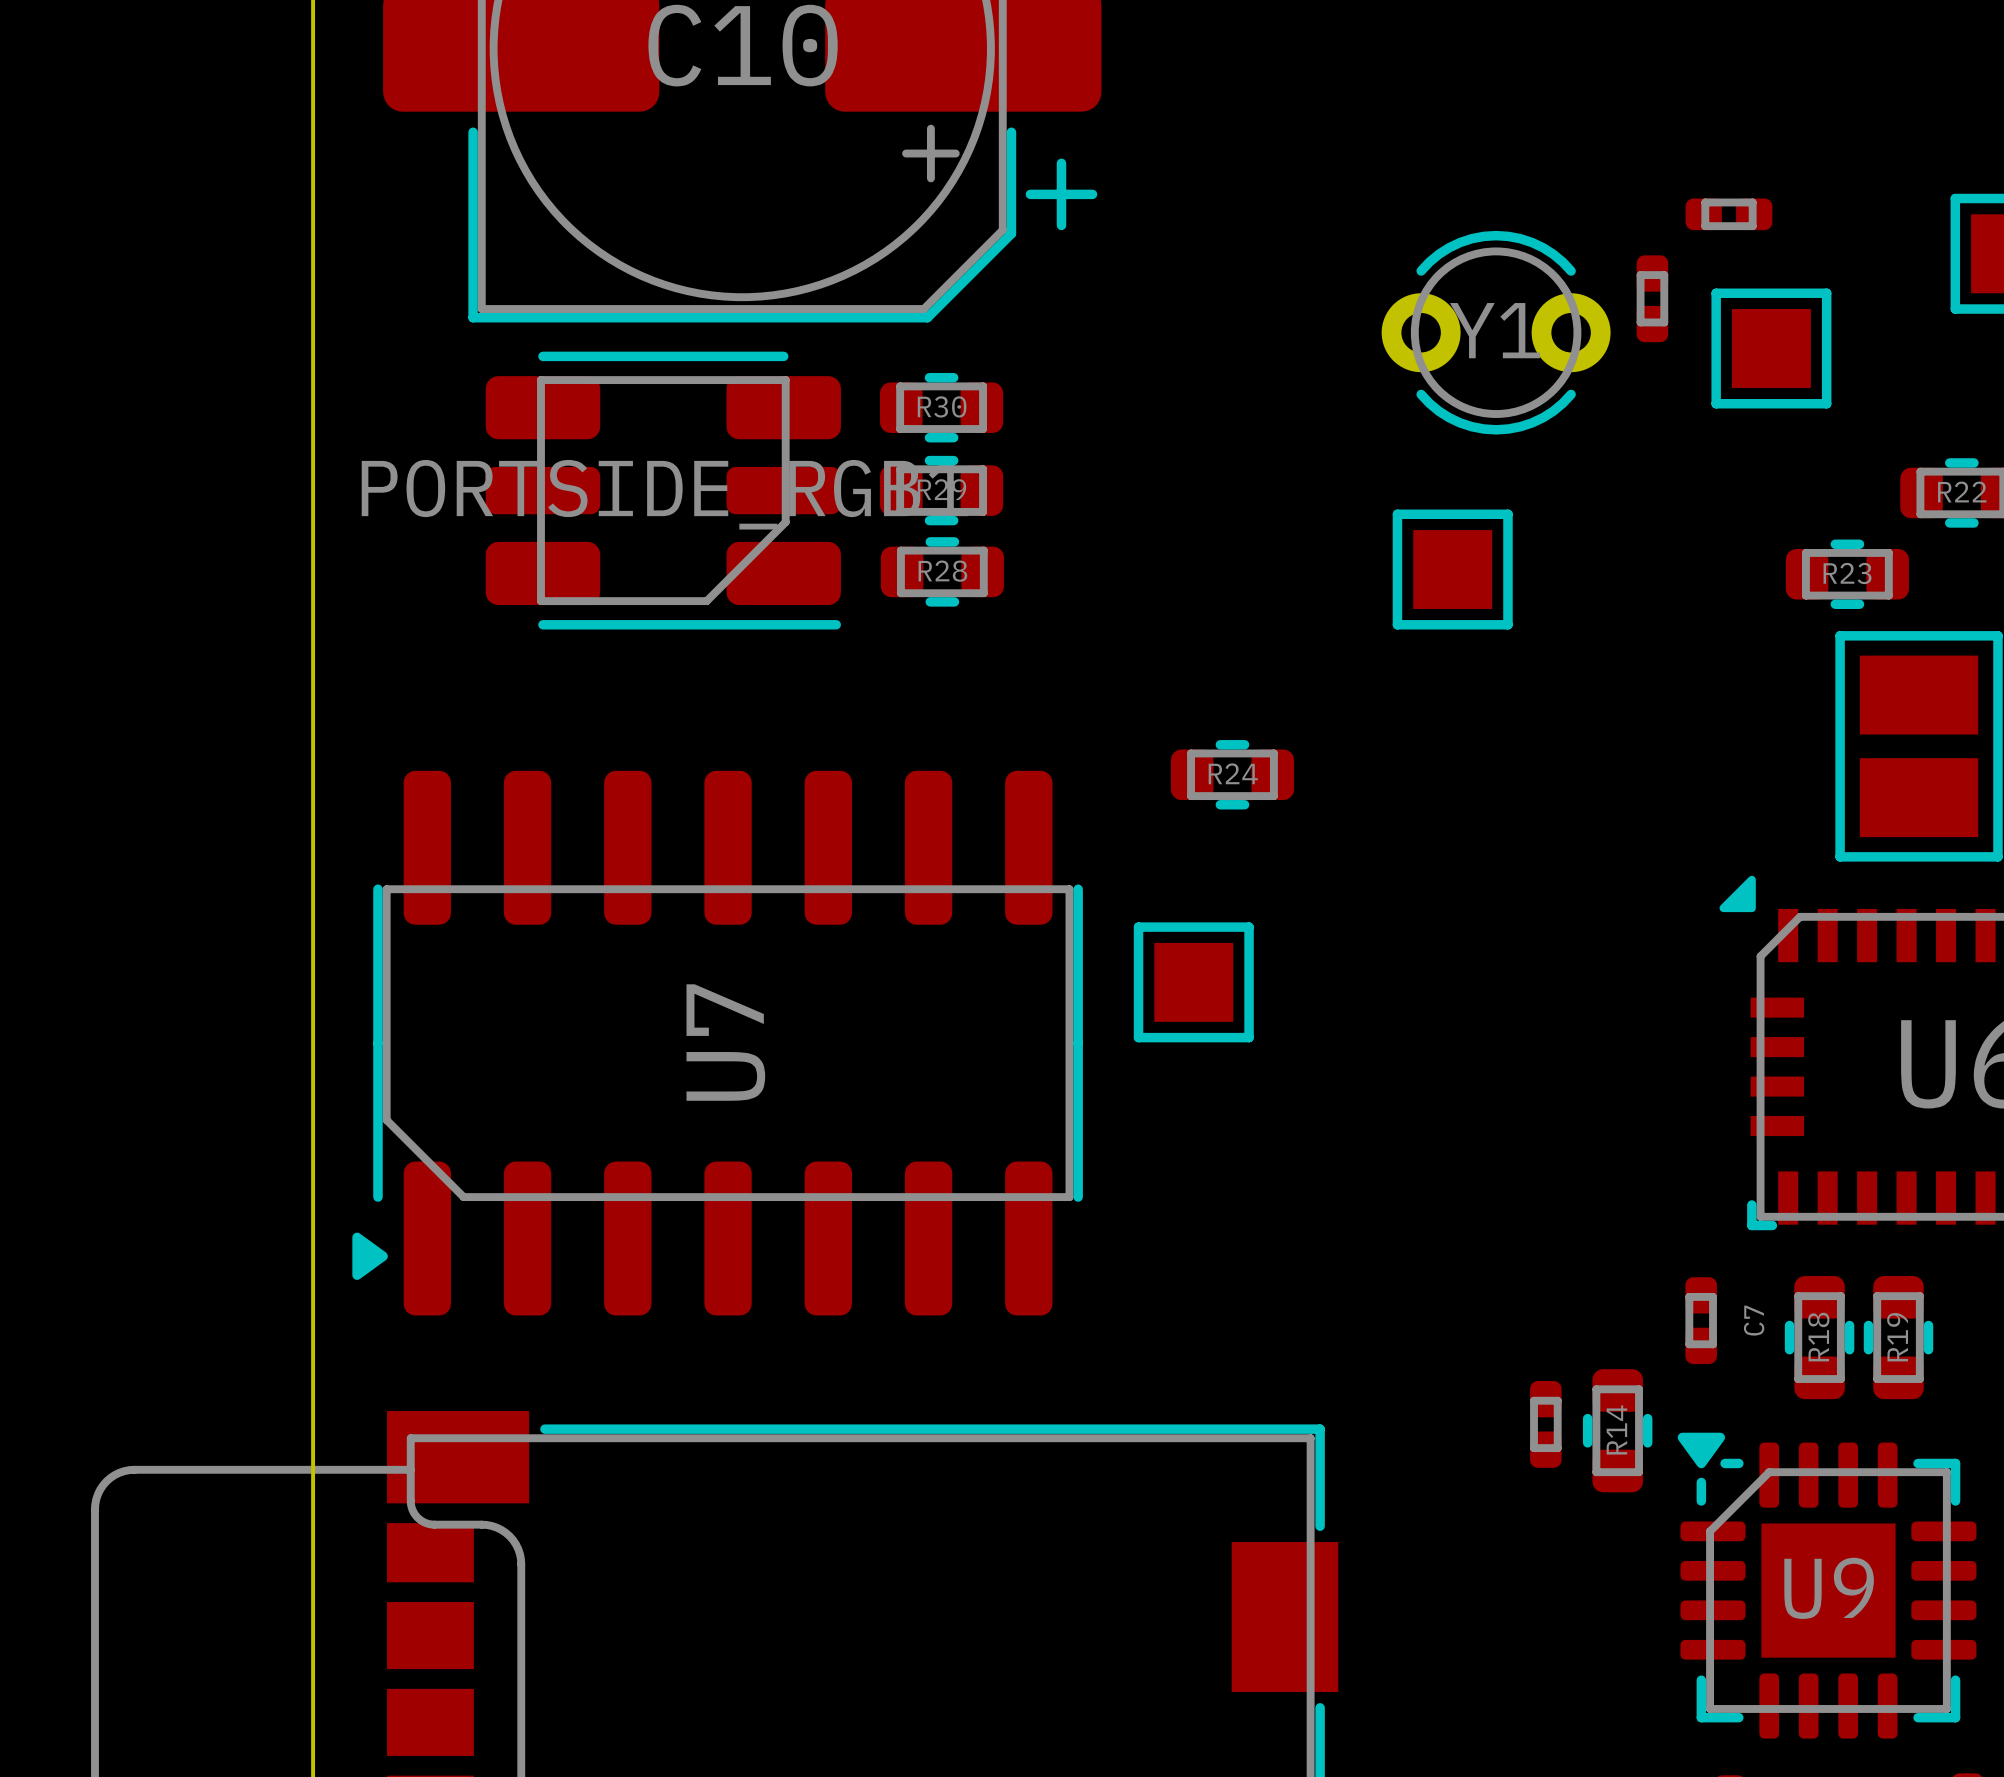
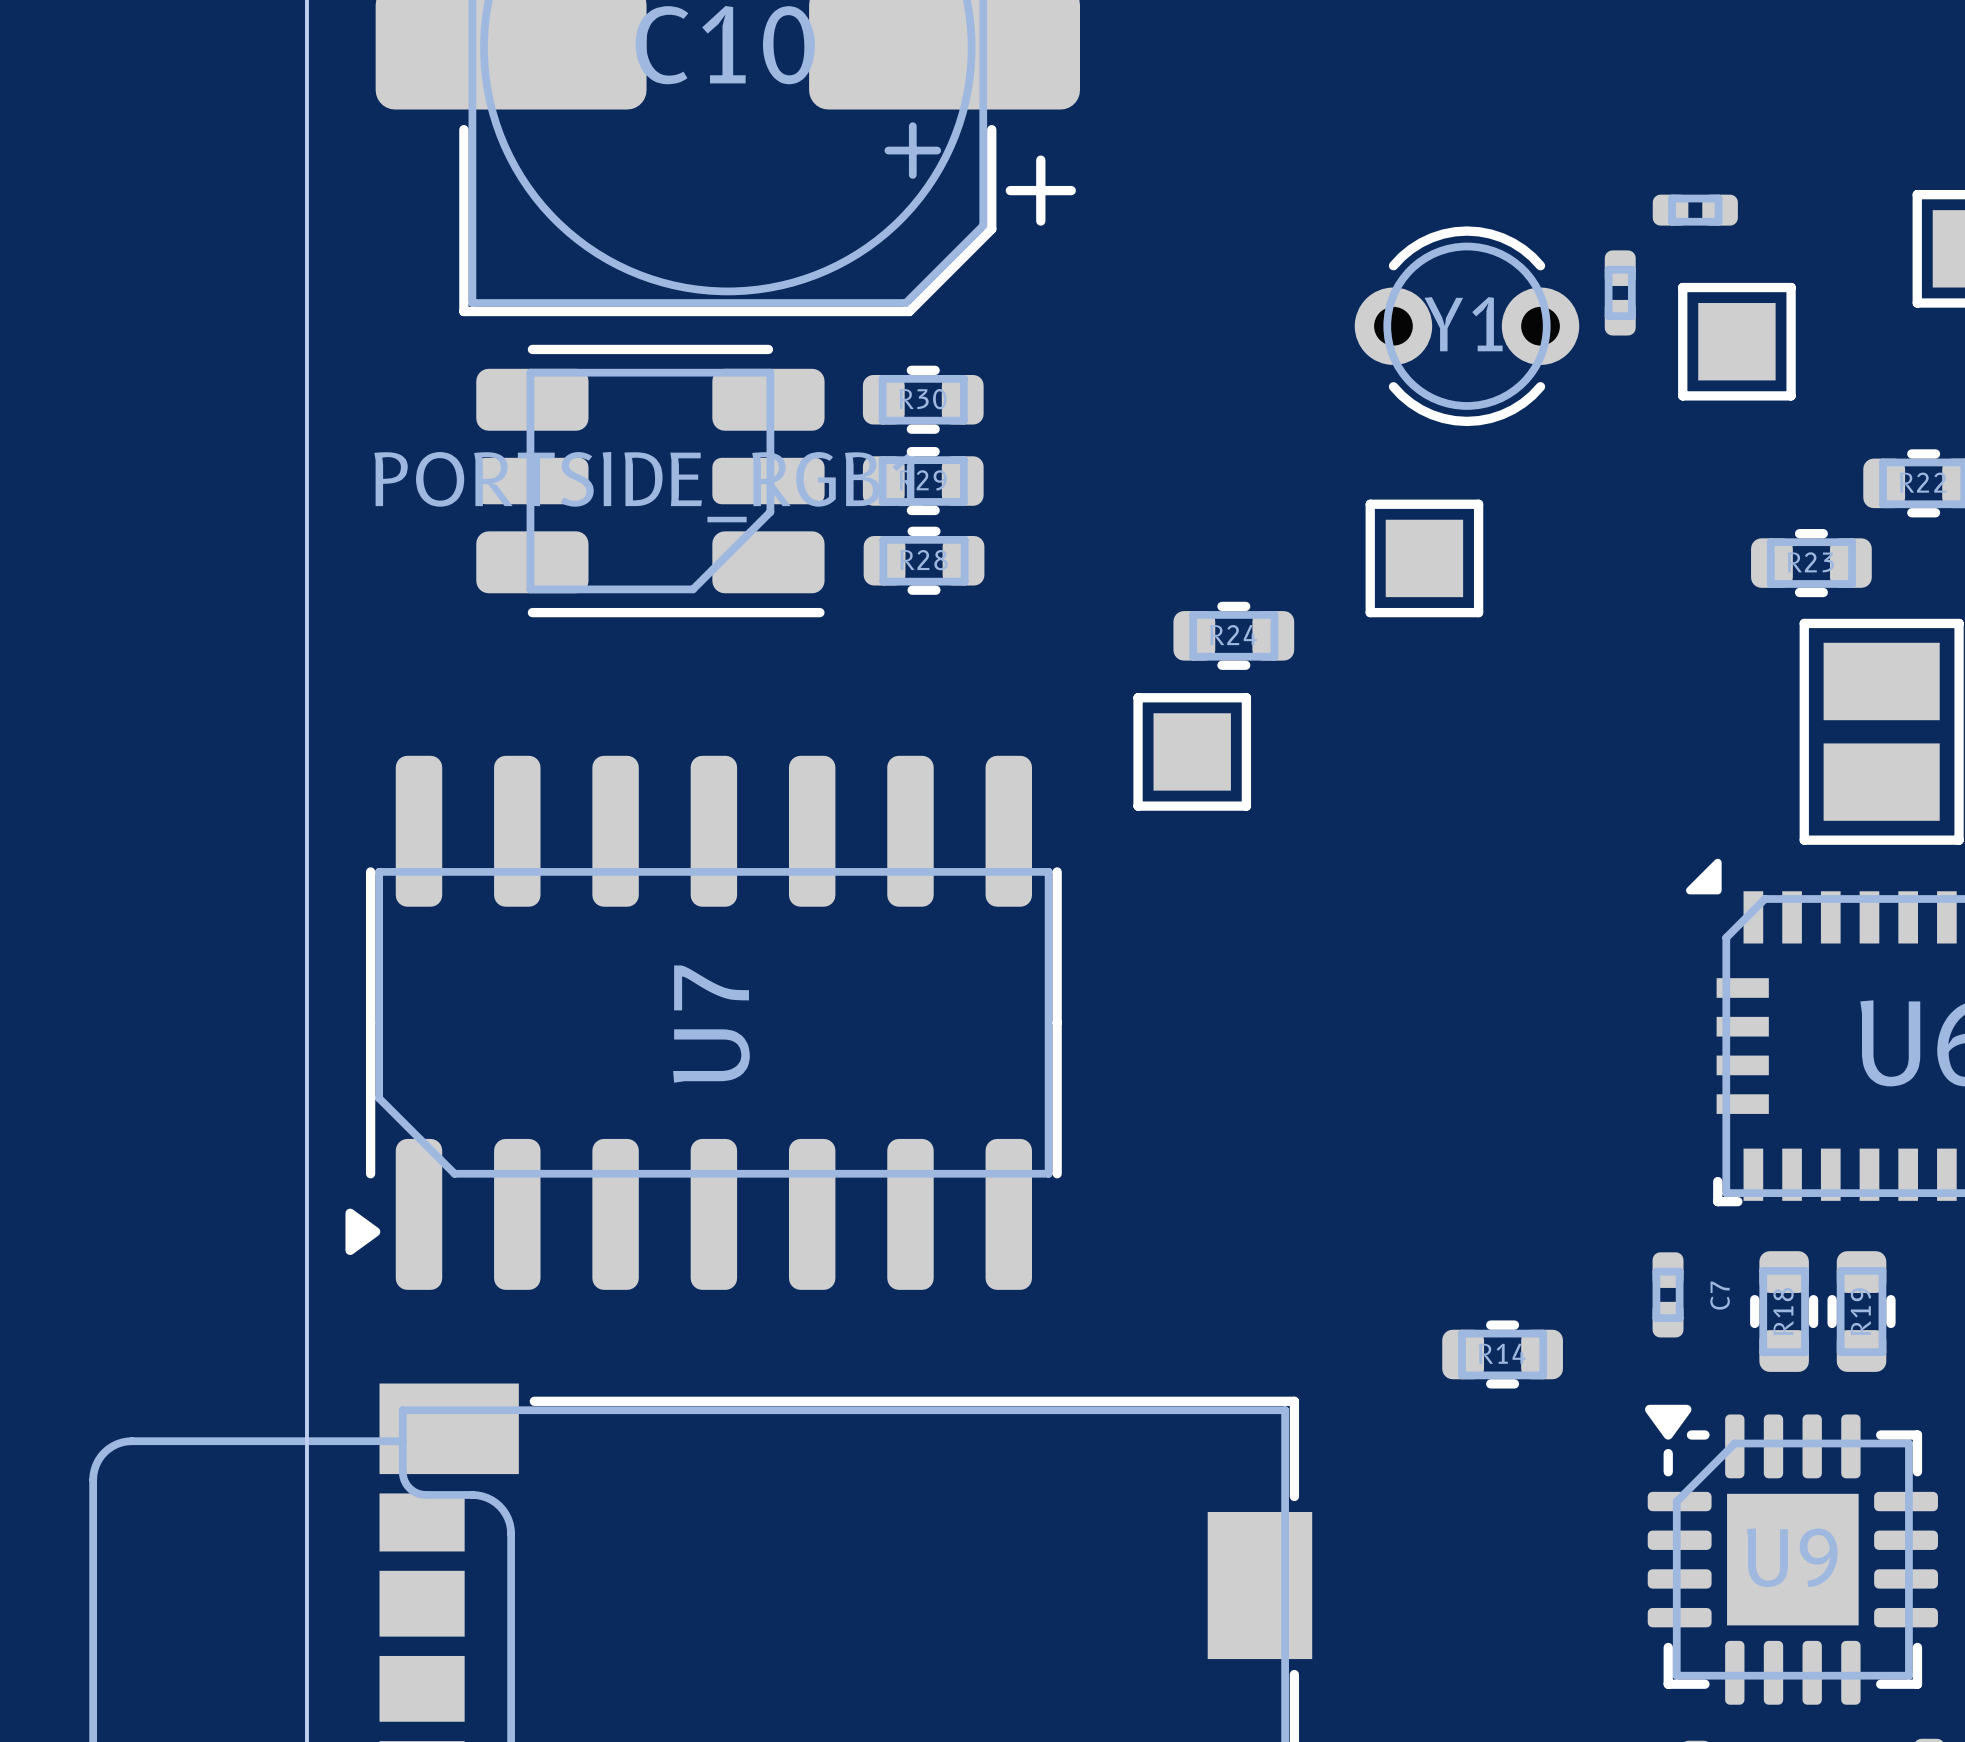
R24 position: (1232, 774) -> (1233, 635)
part position: (1193, 982) -> (1192, 751)
part: (1545, 1424) -> none
R14 rotation: 0° (1617, 1430) -> 90° clockwise (1502, 1354)
R14 position: (1617, 1430) -> (1502, 1354)

